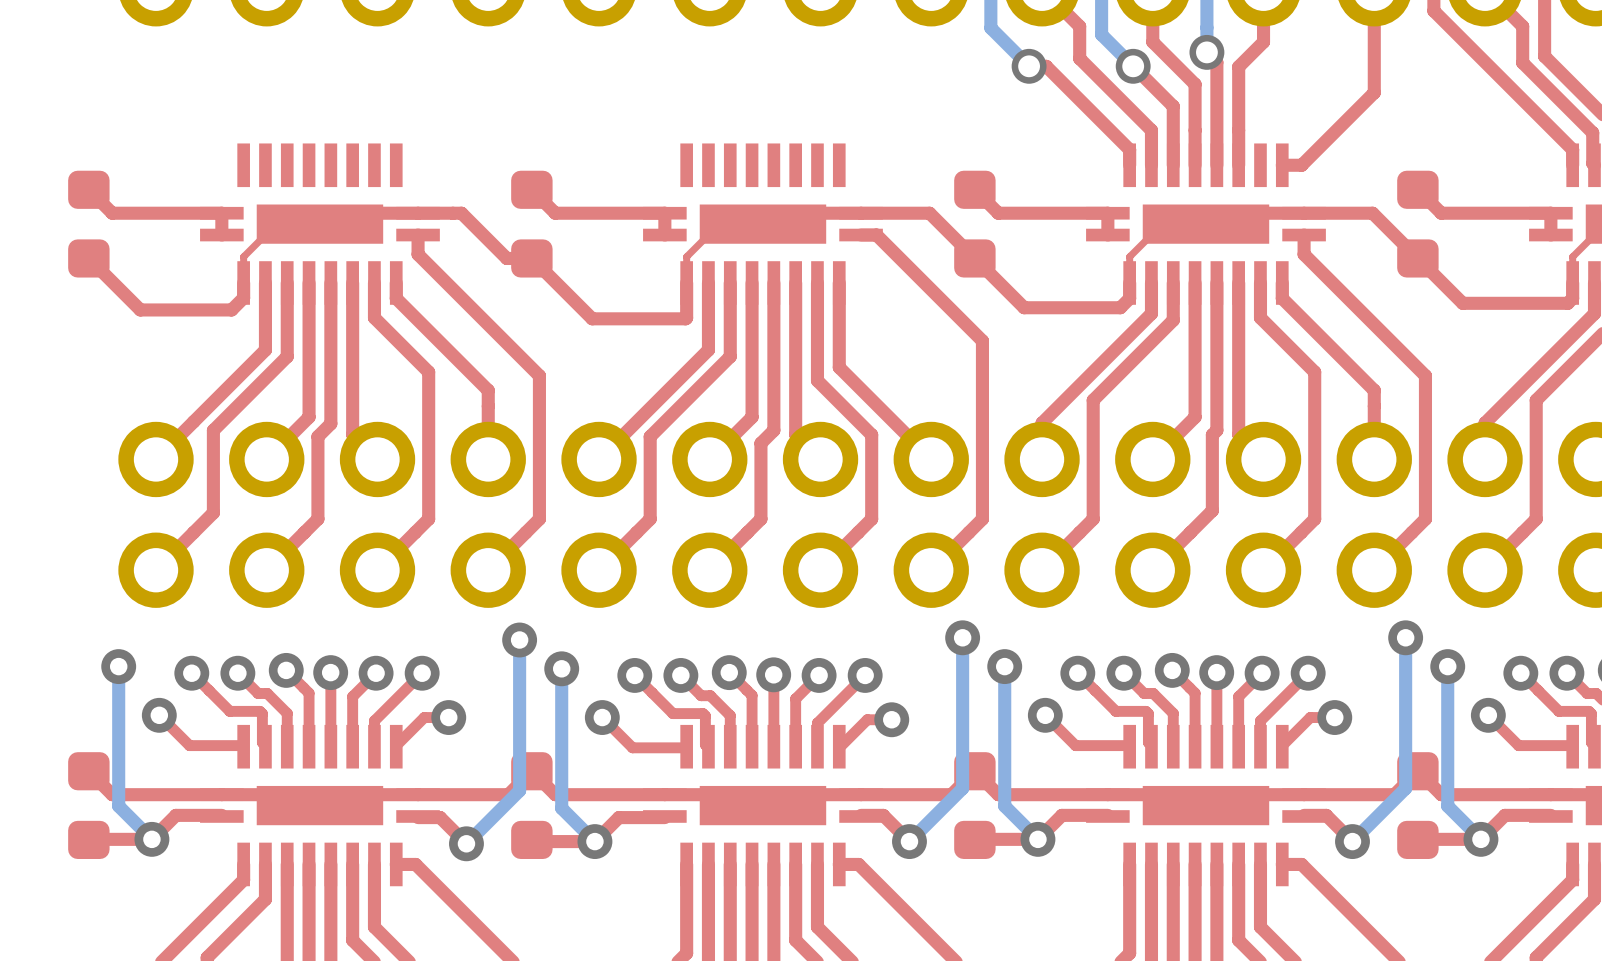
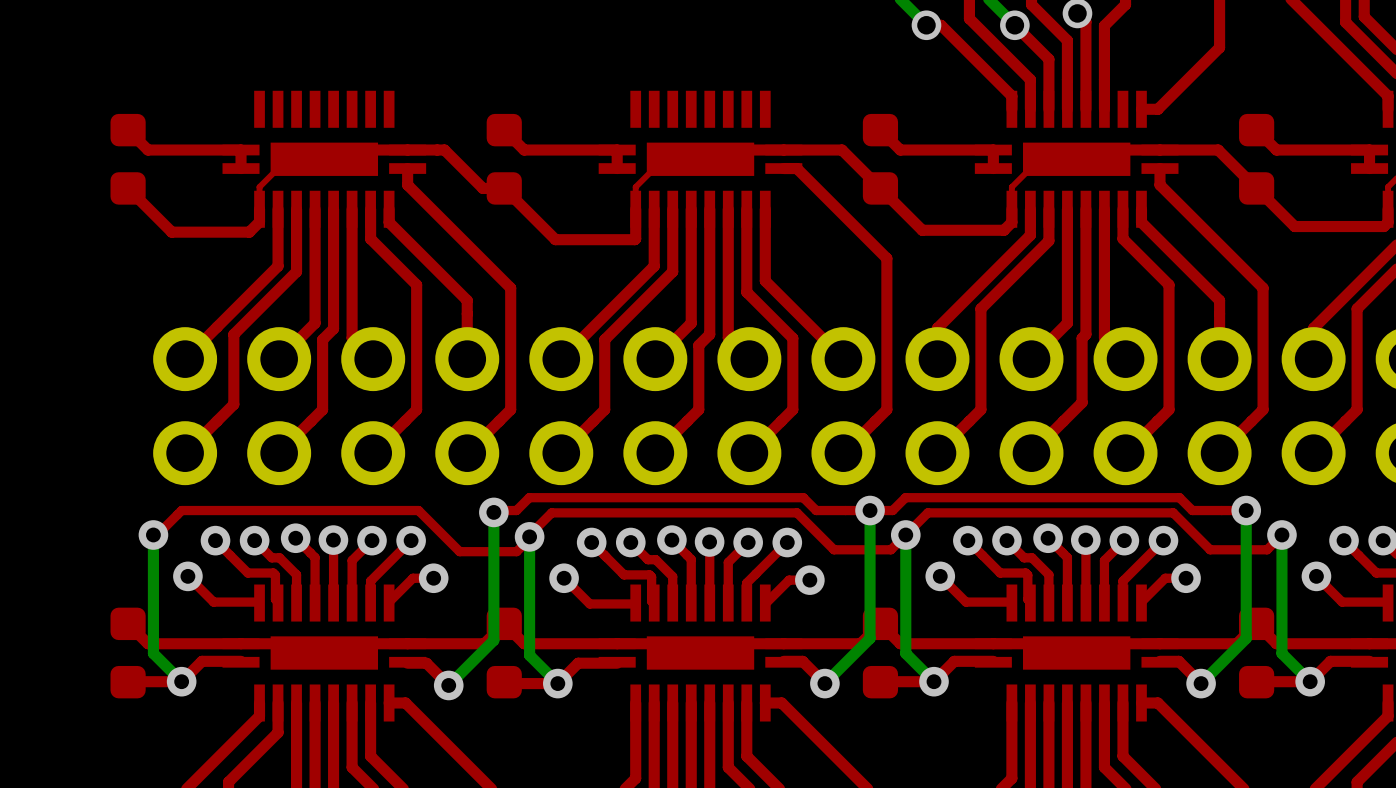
top track: none -> (1246, 510) (1192, 510) (1179, 497) (905, 497) (892, 510) (816, 510) (803, 497) (529, 497) (516, 510) (493, 510)
top track: none -> (1281, 534) (1267, 549) (1210, 549) (1173, 512) (927, 512) (890, 549) (833, 549) (797, 512) (551, 512) (529, 534)
top track: none -> (531, 536) (516, 551) (459, 551) (418, 510) (181, 510) (155, 536)

